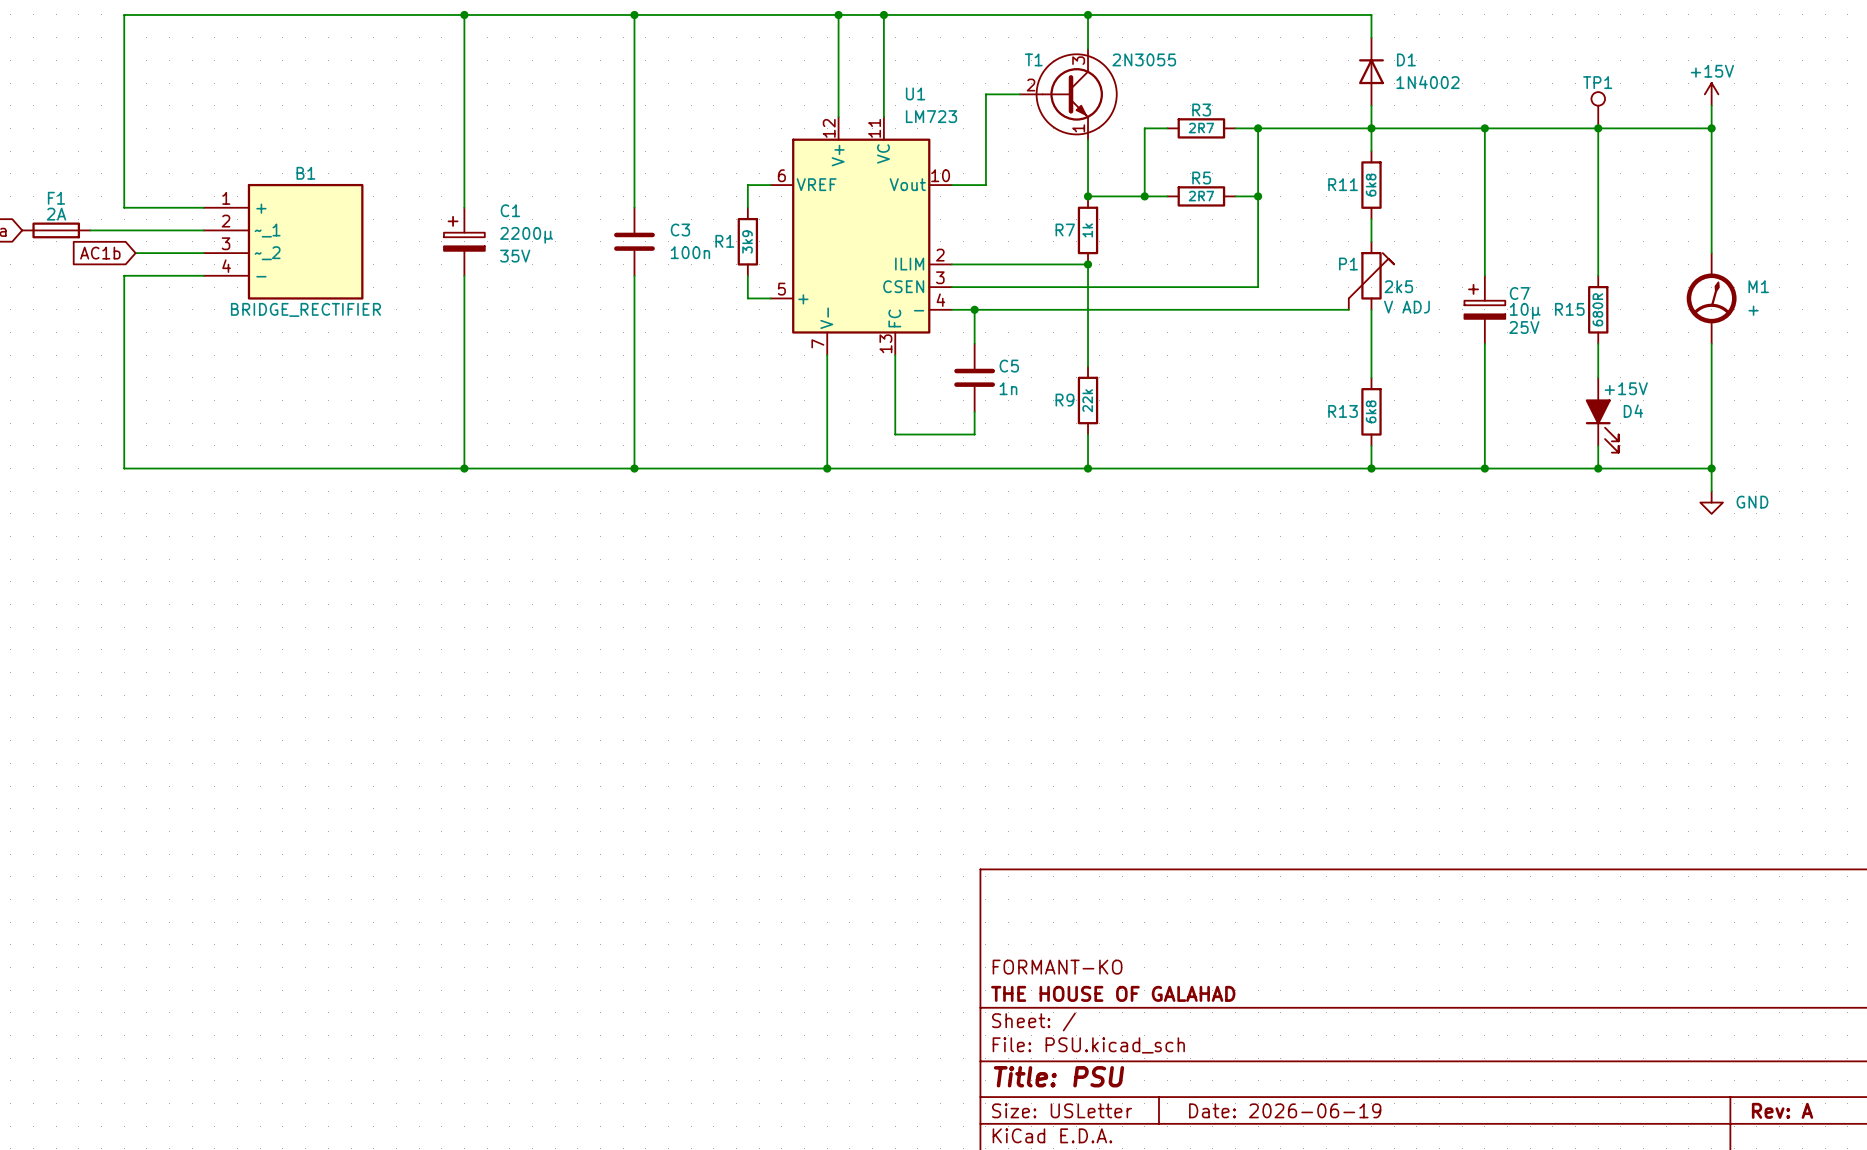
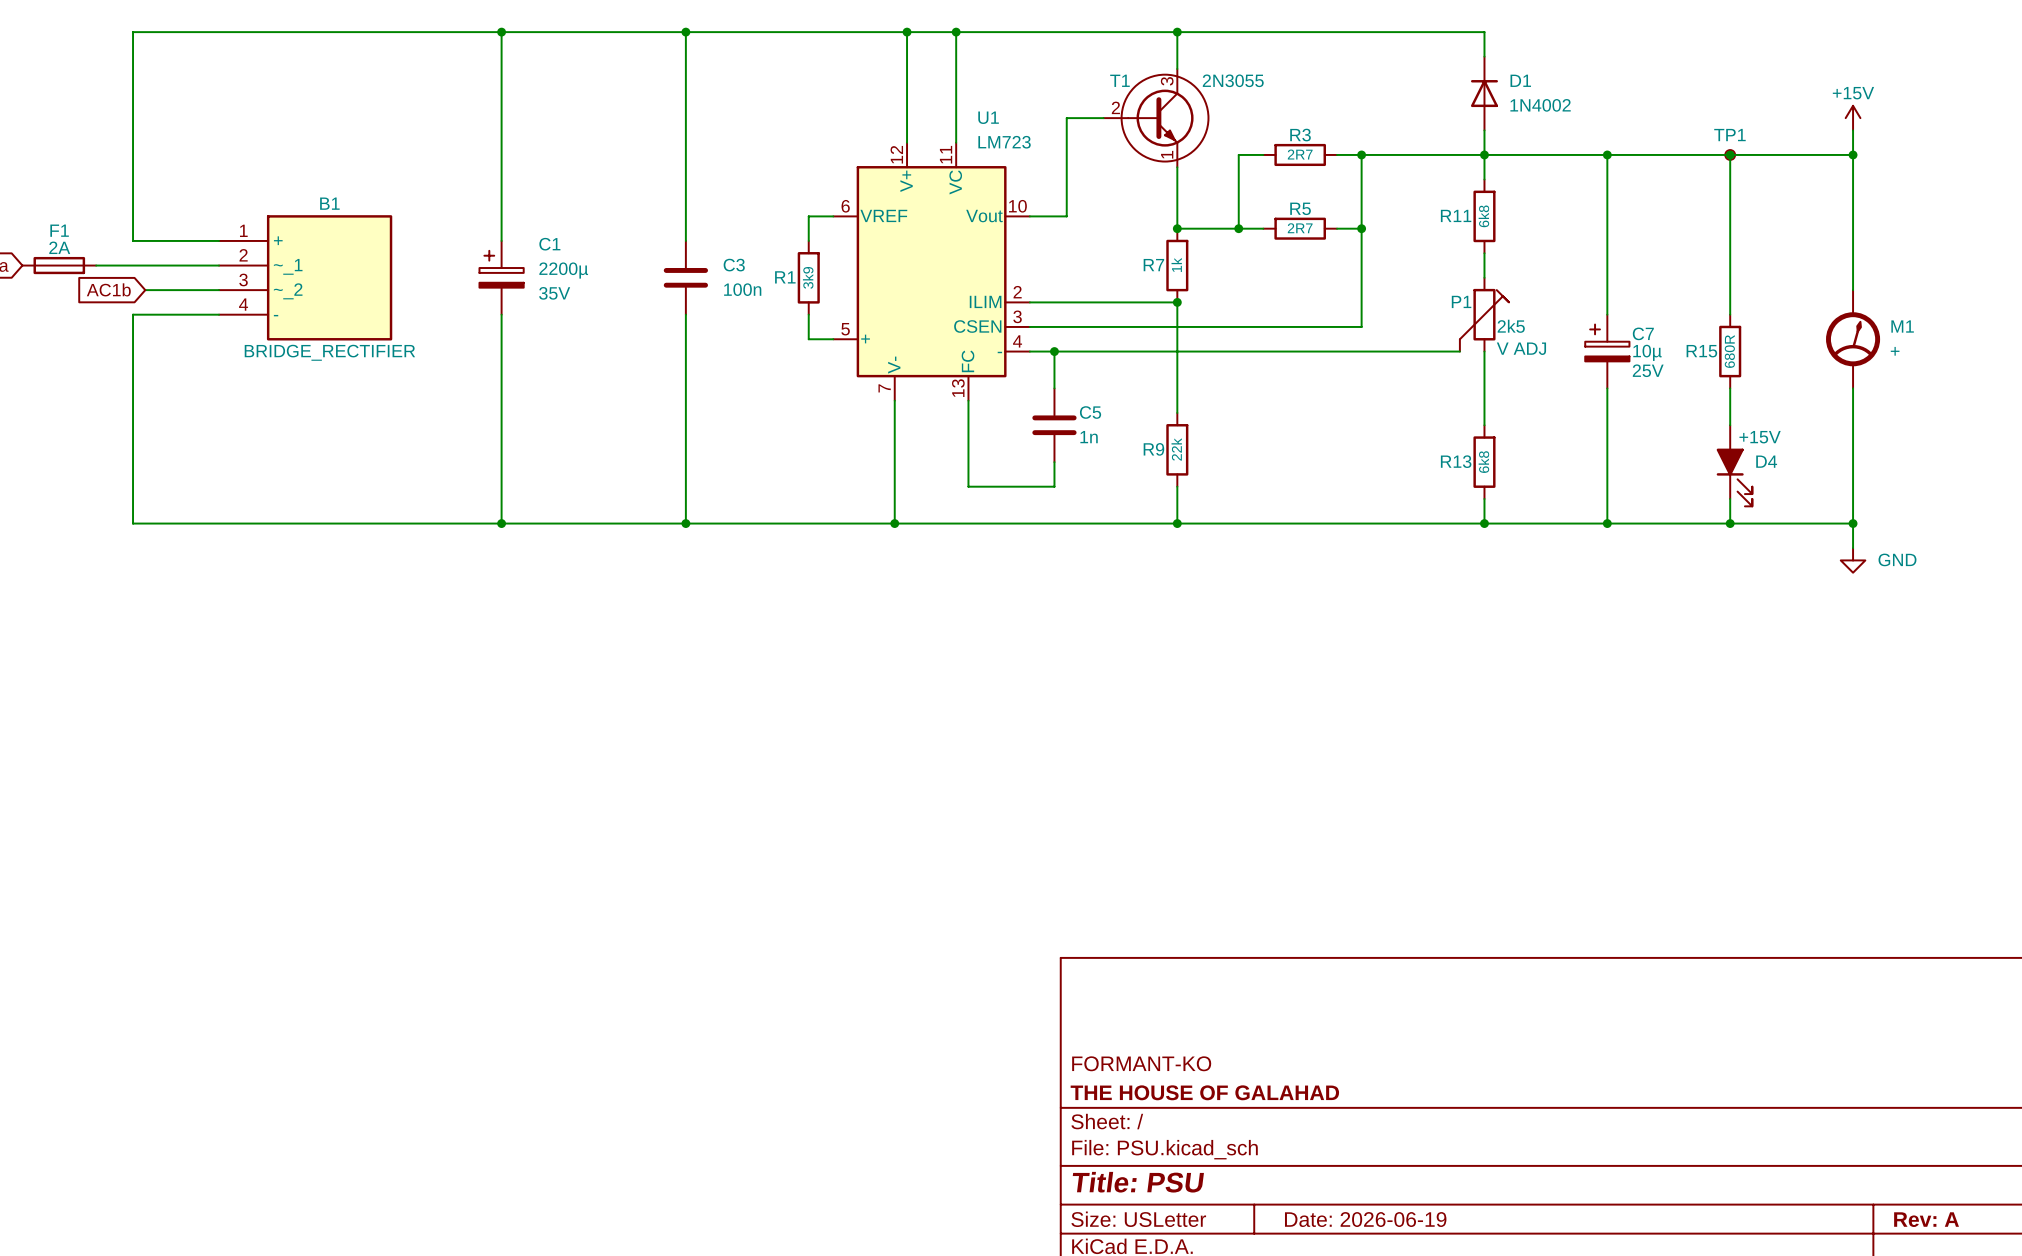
TP1 symbol: [1591, 92, 1606, 129] -> [1725, 150, 1736, 160]

